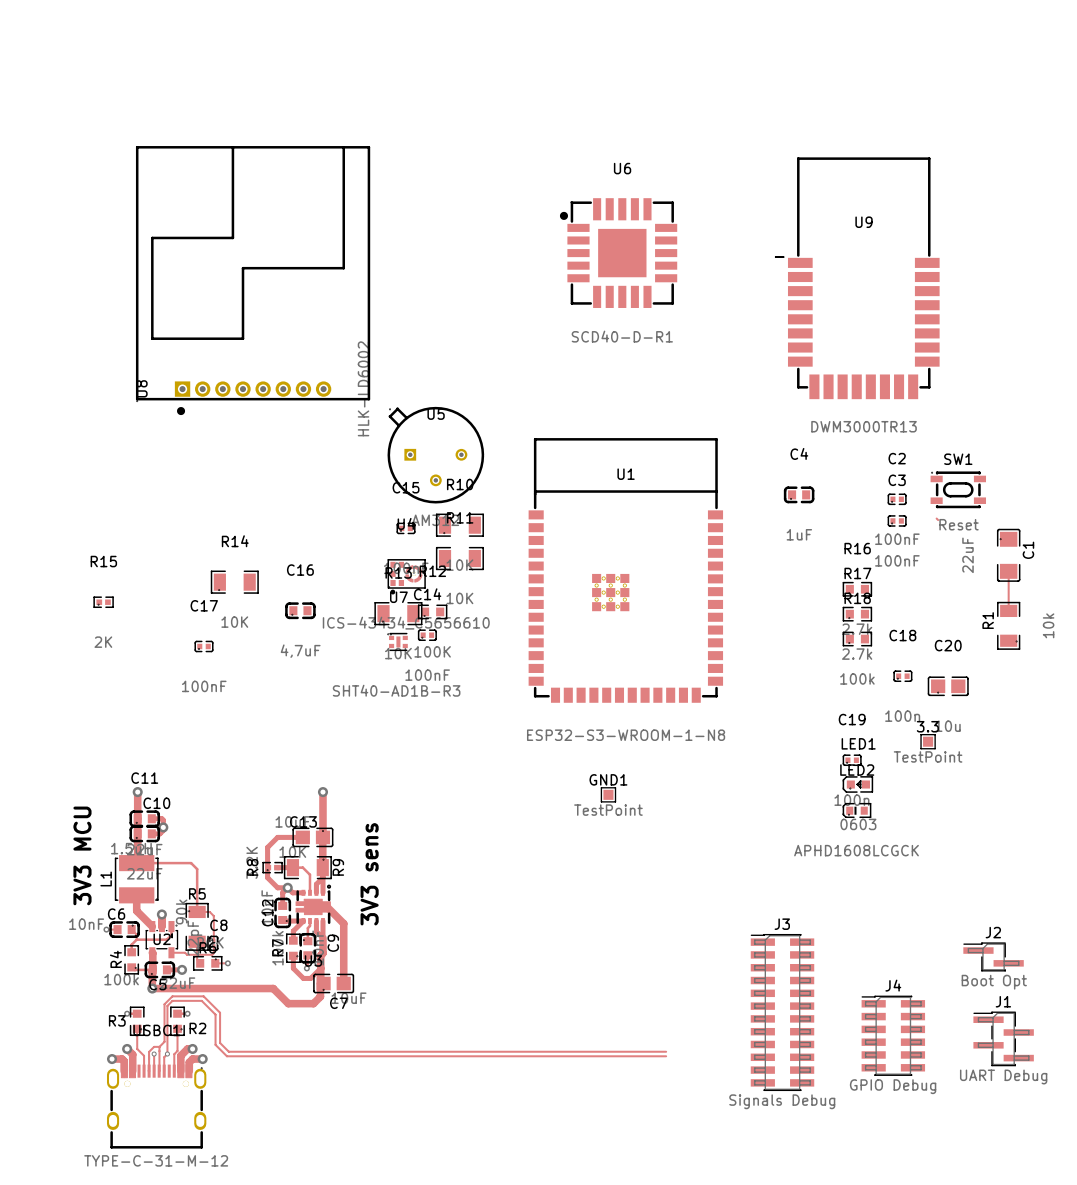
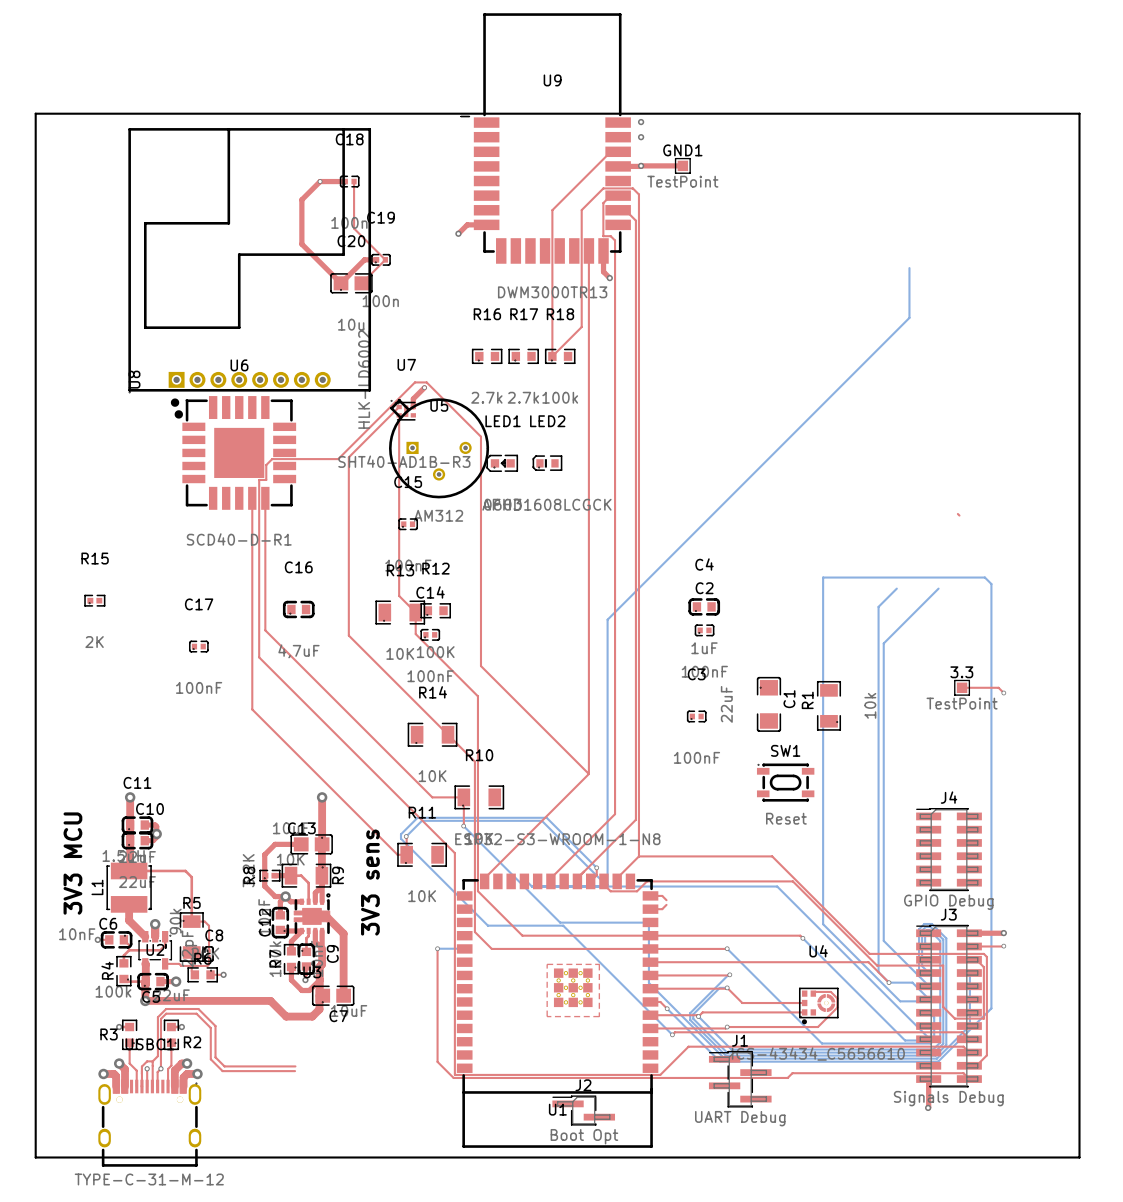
board edge: none -> (35, 113) (1079, 113) (1079, 1157) (35, 1157) (35, 113)
via: none -> (641, 122)
via: none -> (641, 137)
top track: none -> (618, 151) (610, 151) (552, 210) (552, 356) (581, 327) (581, 210) (603, 188) (632, 188) (638, 194) (638, 856)
via: none -> (641, 165)
top track: none -> (682, 165) (618, 166)
via: none -> (320, 181)
top track: none -> (345, 181) (320, 181) (301, 199) (301, 244) (341, 283) (364, 259) (376, 259)
top track: none -> (354, 181) (354, 228) (385, 259) (361, 283)
top track: none -> (625, 195) (610, 195) (603, 203) (603, 236) (610, 236) (615, 240) (615, 814) (550, 878) (550, 881)
top track: none -> (625, 210) (635, 220) (635, 819) (577, 878)
top track: none -> (486, 224) (467, 224) (458, 233)
via: none -> (458, 233)
U6 position: (618, 253) -> (235, 452)
top track: none -> (588, 250) (588, 774)
top track: none -> (603, 250) (603, 271) (609, 278)
U9 position: (857, 278) -> (545, 138)
bottom track: none -> (909, 268) (909, 317) (607, 619) (607, 884) (605, 886)
via: none -> (609, 278)
top track: none -> (424, 387) (413, 398) (413, 407)
via: none -> (424, 387)
top track: none -> (398, 407) (348, 457) (348, 635) (474, 761) (474, 932) (491, 948) (727, 948)
top track: none -> (399, 415) (399, 595) (415, 612) (415, 634) (477, 696) (477, 891) (522, 935) (800, 935) (802, 938)
SW1 position: (958, 489) -> (785, 782)
C4 position: (799, 494) -> (704, 606)
C2 position: (897, 499) -> (704, 630)
top track: none -> (252, 498) (252, 709) (397, 854) (406, 854) (406, 836)
top track: none -> (265, 498) (265, 630) (432, 797) (463, 797) (463, 826)
C3 position: (897, 520) -> (696, 716)
R10 position: (459, 525) -> (479, 797)
C1 position: (1008, 555) -> (768, 704)
R11 position: (459, 558) -> (422, 854)
U1 rotation: 0° (625, 570) -> 180° (557, 1010)
U1 position: (625, 570) -> (557, 1010)
top track: (1008, 571) (1008, 610) -> none
U4 position: (406, 576) -> (818, 1005)
R14 position: (234, 582) -> (432, 734)
R16 position: (857, 589) -> (487, 356)
bottom track: none -> (896, 588) (878, 606) (878, 972) (889, 982) (912, 982) (928, 998)
bottom track: none -> (938, 588) (883, 643) (883, 940) (928, 985)
R17 position: (857, 614) -> (523, 356)
R1 position: (1008, 625) -> (828, 705)
R18 position: (857, 639) -> (560, 356)
U7 position: (397, 641) -> (405, 411)
C18 position: (902, 676) -> (349, 181)
top track: none -> (962, 687) (998, 687) (1003, 693)
C20 position: (948, 686) -> (351, 283)
via: none -> (1003, 693)
3.3 position: (928, 741) -> (962, 687)
C19 position: (852, 760) -> (380, 259)
top track: none -> (588, 774) (480, 666) (480, 436) (426, 382) (414, 382) (338, 459) (272, 459) (266, 465) (266, 479) (259, 479) (259, 657) (454, 853) (454, 1074) (660, 1074) (688, 1046) (963, 1046) (969, 1052)
top track: none -> (588, 774) (484, 878)
LED1 position: (857, 784) -> (502, 463)
GND1 position: (608, 794) -> (682, 165)
LED2 position: (857, 810) -> (547, 463)
bottom track: none -> (463, 826) (560, 922) (648, 922) (648, 983) (724, 1058) (936, 1058) (969, 1025) (969, 972)
via: none -> (463, 826)
bottom track: none -> (406, 836) (421, 820) (541, 820) (604, 883)
via: none -> (406, 836)
top track: none -> (638, 856) (772, 856) (869, 953) (983, 953) (986, 956) (986, 1055) (976, 1065) (969, 1065)
top track: none -> (638, 856) (617, 878) (617, 881)
top track: none -> (596, 867) (596, 875) (590, 881)
bottom track: none -> (596, 867) (546, 817) (417, 817) (400, 834) (400, 838) (487, 925) (563, 925) (672, 1034)
via: none -> (596, 867)
bottom track: none -> (526, 880) (531, 886) (777, 886) (928, 1037)
top track: none -> (603, 881) (603, 884) (610, 891) (637, 891) (646, 881) (792, 881) (877, 965) (943, 965) (943, 1006) (954, 1018) (983, 1018) (983, 967) (976, 959) (969, 959)
top track: none -> (650, 895) (662, 895) (666, 900)
top track: none -> (666, 904) (662, 909) (650, 909)
top track: none -> (1003, 933) (969, 933)
via: none -> (1003, 933)
bottom track: none -> (802, 938) (905, 1040) (929, 1040) (931, 1038) (930, 1027)
via: none -> (802, 938)
bottom track: none -> (928, 946) (925, 943) (925, 931) (926, 930) (929, 930) (940, 940) (940, 1042) (933, 1049) (731, 1049) (698, 1016)
top track: none -> (1003, 946) (969, 946)
via: none -> (1003, 946)
top track: none -> (437, 948) (437, 1061) (453, 1077) (787, 1077) (792, 1073) (963, 1073) (969, 1079)
bottom track: none -> (437, 948) (463, 948)
via: none -> (437, 948)
bottom track: none -> (727, 948) (821, 1043) (930, 1043) (934, 1039) (934, 1017) (928, 1011)
via: none -> (727, 948)
bottom track: none -> (928, 959) (931, 962) (931, 999) (929, 1001) (900, 1001) (823, 924) (823, 577) (984, 577) (991, 584) (991, 1008) (938, 1061) (720, 1061) (667, 1008)
top track: none -> (650, 962) (868, 962) (889, 982)
top zone outline: none -> (547, 964) (599, 964) (599, 1016) (547, 1016) (547, 964)
J2 position: (993, 956) -> (583, 1110)
bottom track: none -> (928, 972) (922, 966) (922, 930) (925, 927) (930, 927) (943, 939) (943, 1043) (934, 1052) (727, 1052) (693, 1018) (693, 1014) (719, 987) (727, 987)
top track: none -> (729, 974) (650, 975)
bottom track: none -> (729, 974) (690, 1013) (690, 1020) (725, 1055) (935, 1055) (946, 1044) (946, 938) (931, 923) (924, 923) (919, 929) (919, 976)
via: none -> (729, 974)
via: none -> (889, 982)
via: none -> (727, 987)
top track: none -> (650, 988) (727, 987) (742, 1003) (804, 1003)
top track: none -> (813, 993) (815, 991) (830, 991) (837, 998) (837, 1007) (817, 1027) (650, 1028)
top track: none -> (650, 1001) (660, 1001) (667, 1008)
via: none -> (667, 1008)
top track: none -> (804, 1012) (702, 1012) (698, 1016) (650, 1015)
via: none -> (698, 1016)
J3 position: (782, 1012) -> (949, 1006)
via: none -> (727, 1027)
top track: none -> (672, 1034) (674, 1032) (962, 1032) (969, 1039)
via: none -> (672, 1034)
J4 position: (893, 1035) -> (949, 849)
J1 position: (1003, 1038) -> (740, 1079)
top track: (297, 1051) (666, 1051) -> none
top track: (296, 1056) (666, 1056) -> none
top track: none -> (928, 1079) (928, 1107)
via: none -> (928, 1107)

